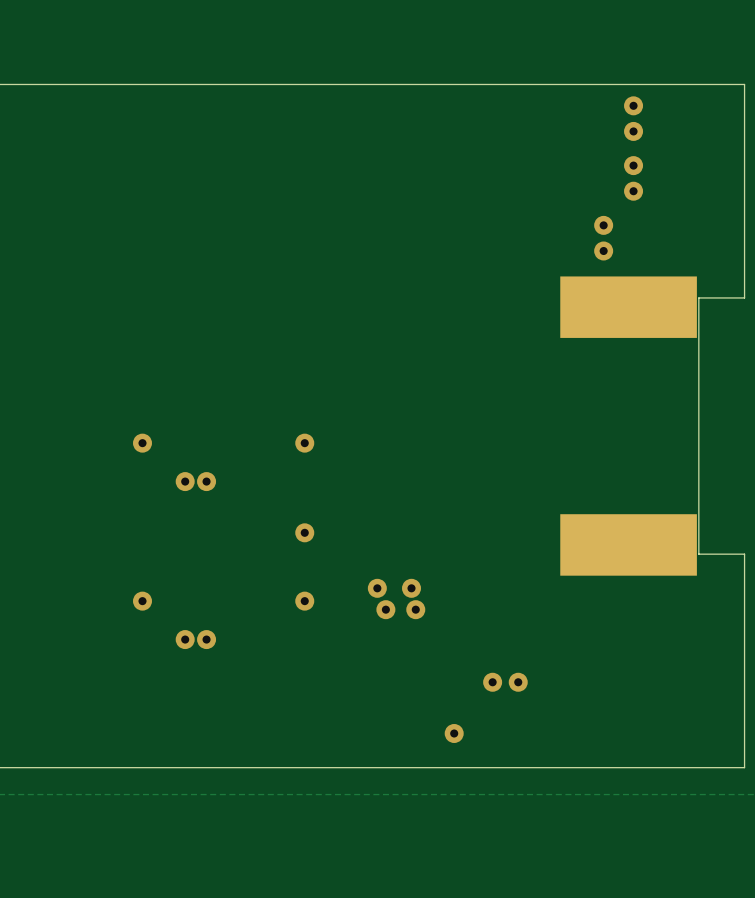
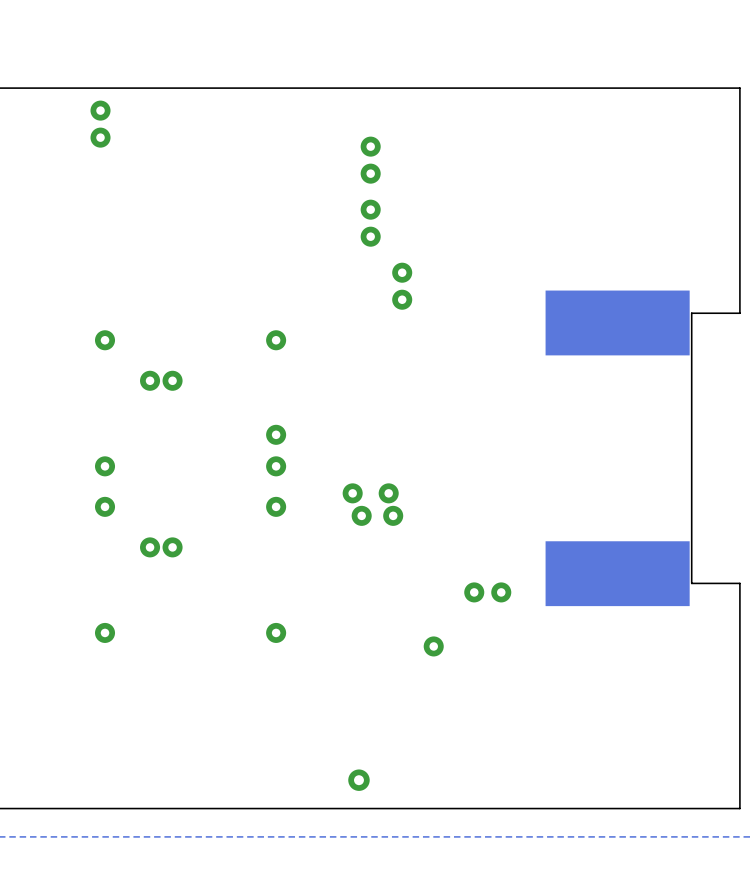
via: none -> (100, 110)
via: (633, 105) -> none
via: none -> (100, 137)
via: (633, 131) -> none
via: none -> (370, 146)
via: none -> (370, 173)
via: (633, 165) -> none
via: (633, 191) -> none
via: none -> (370, 209)
via: none -> (370, 236)
via: (603, 225) -> none
via: (603, 251) -> none
via: none -> (402, 272)
via: none -> (402, 299)
via: none -> (105, 340)
via: none -> (276, 340)
via: none -> (150, 380)
via: none -> (172, 380)
via: none -> (276, 434)
via: none -> (352, 493)
via: none -> (388, 493)
via: none -> (105, 506)
via: (185, 481) -> none
via: (206, 481) -> none
via: none -> (276, 506)
via: none -> (361, 515)
via: none -> (393, 515)
via: none -> (150, 547)
via: none -> (172, 547)
via: (304, 532) -> none
via: none -> (474, 592)
via: none -> (501, 592)
via: (377, 588) -> none
via: (411, 588) -> none
via: (385, 609) -> none
via: (415, 609) -> none
via: none -> (433, 646)
via: (185, 639) -> none
via: (206, 639) -> none
via: (492, 682) -> none
via: (518, 682) -> none
via: (454, 733) -> none
via: none -> (358, 780)

